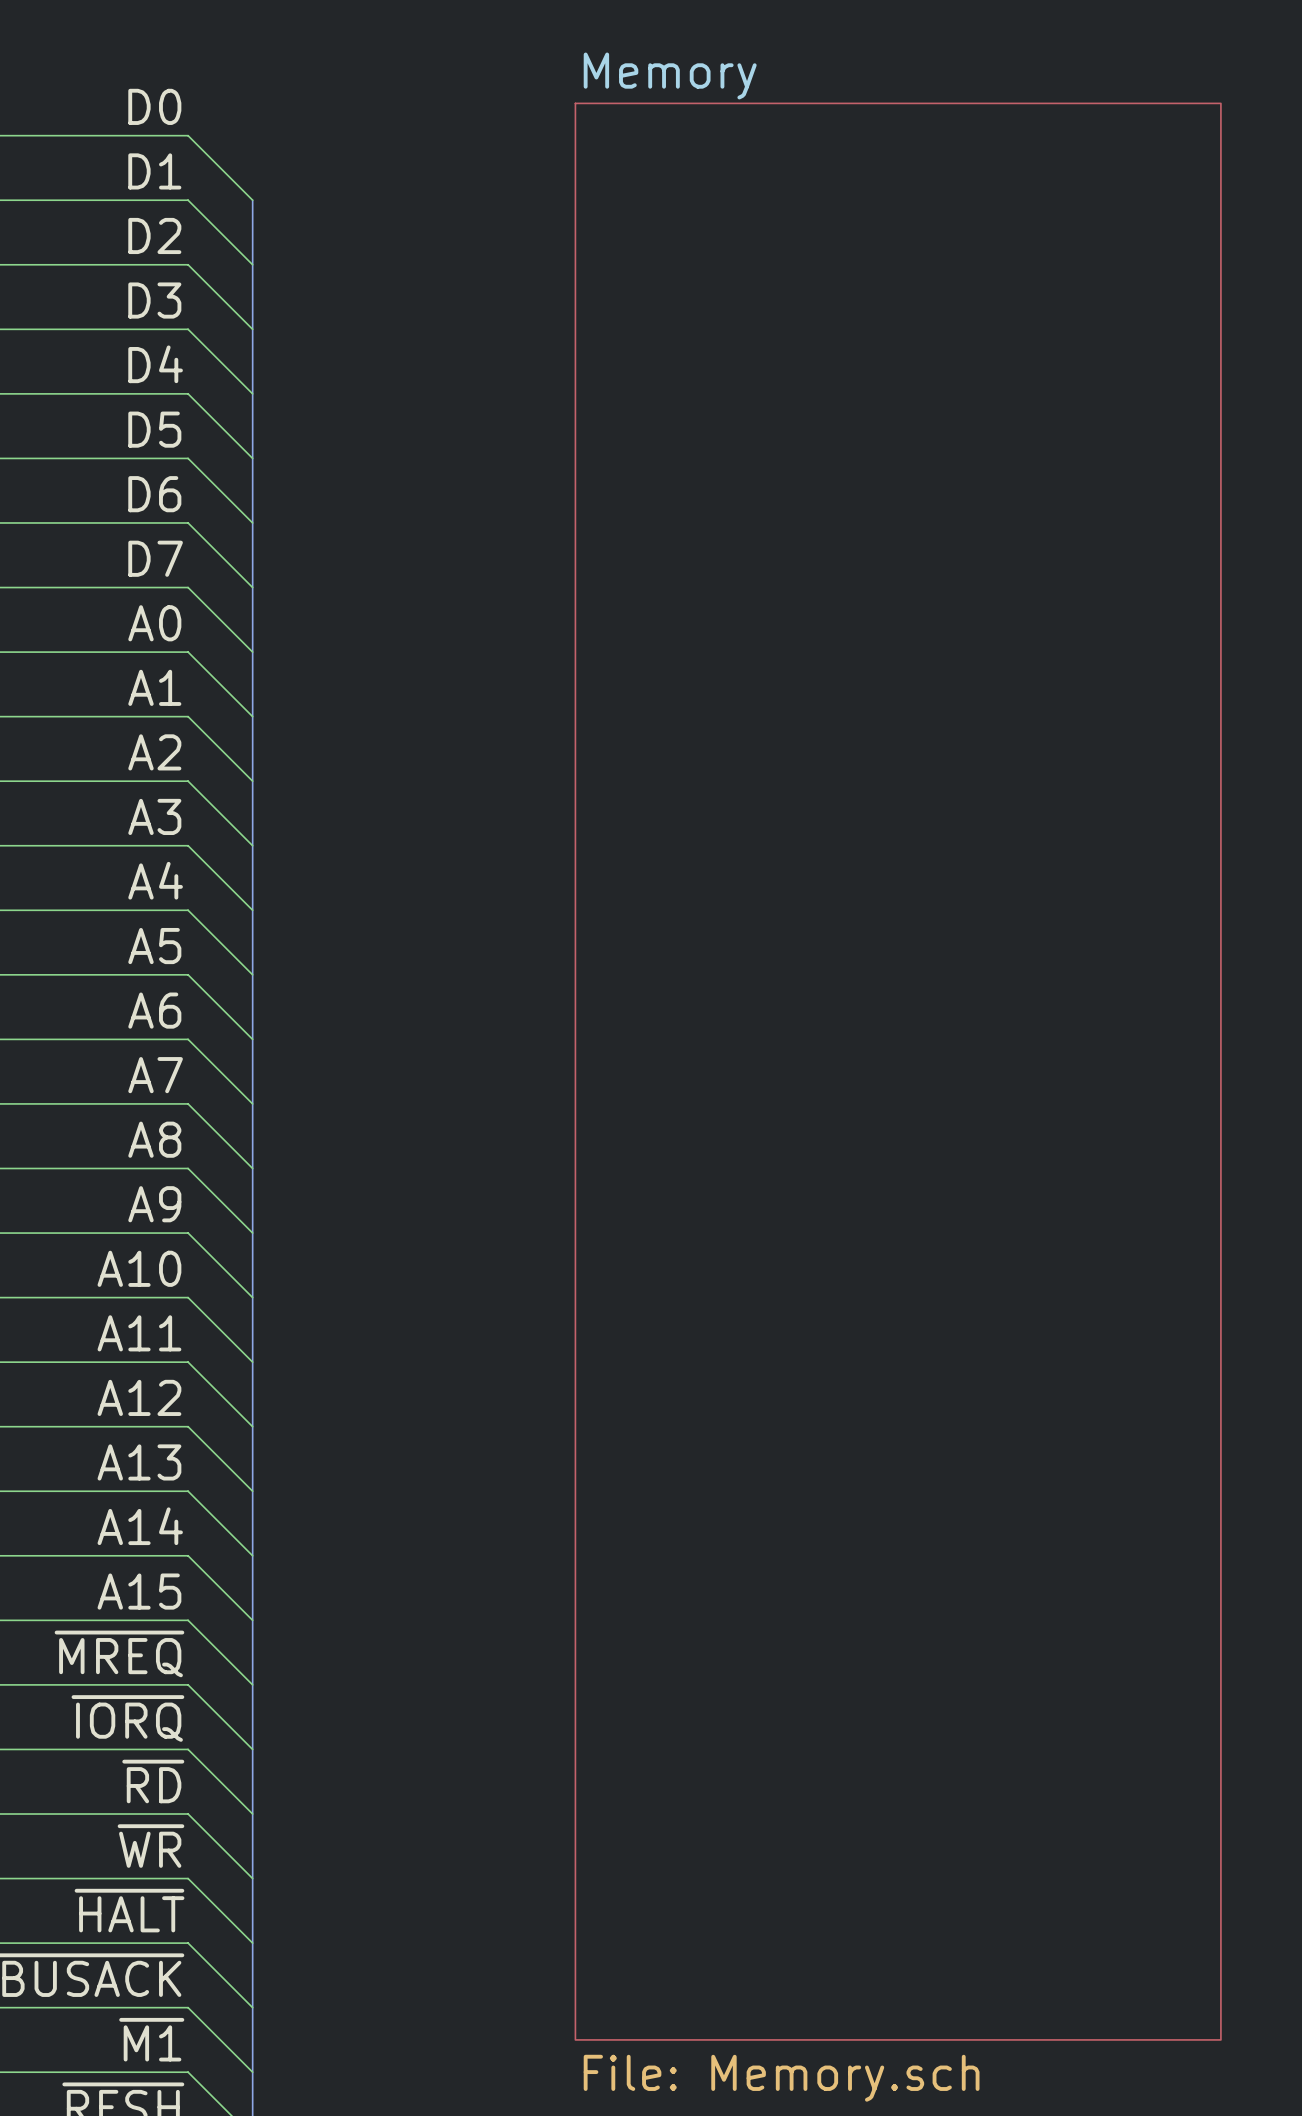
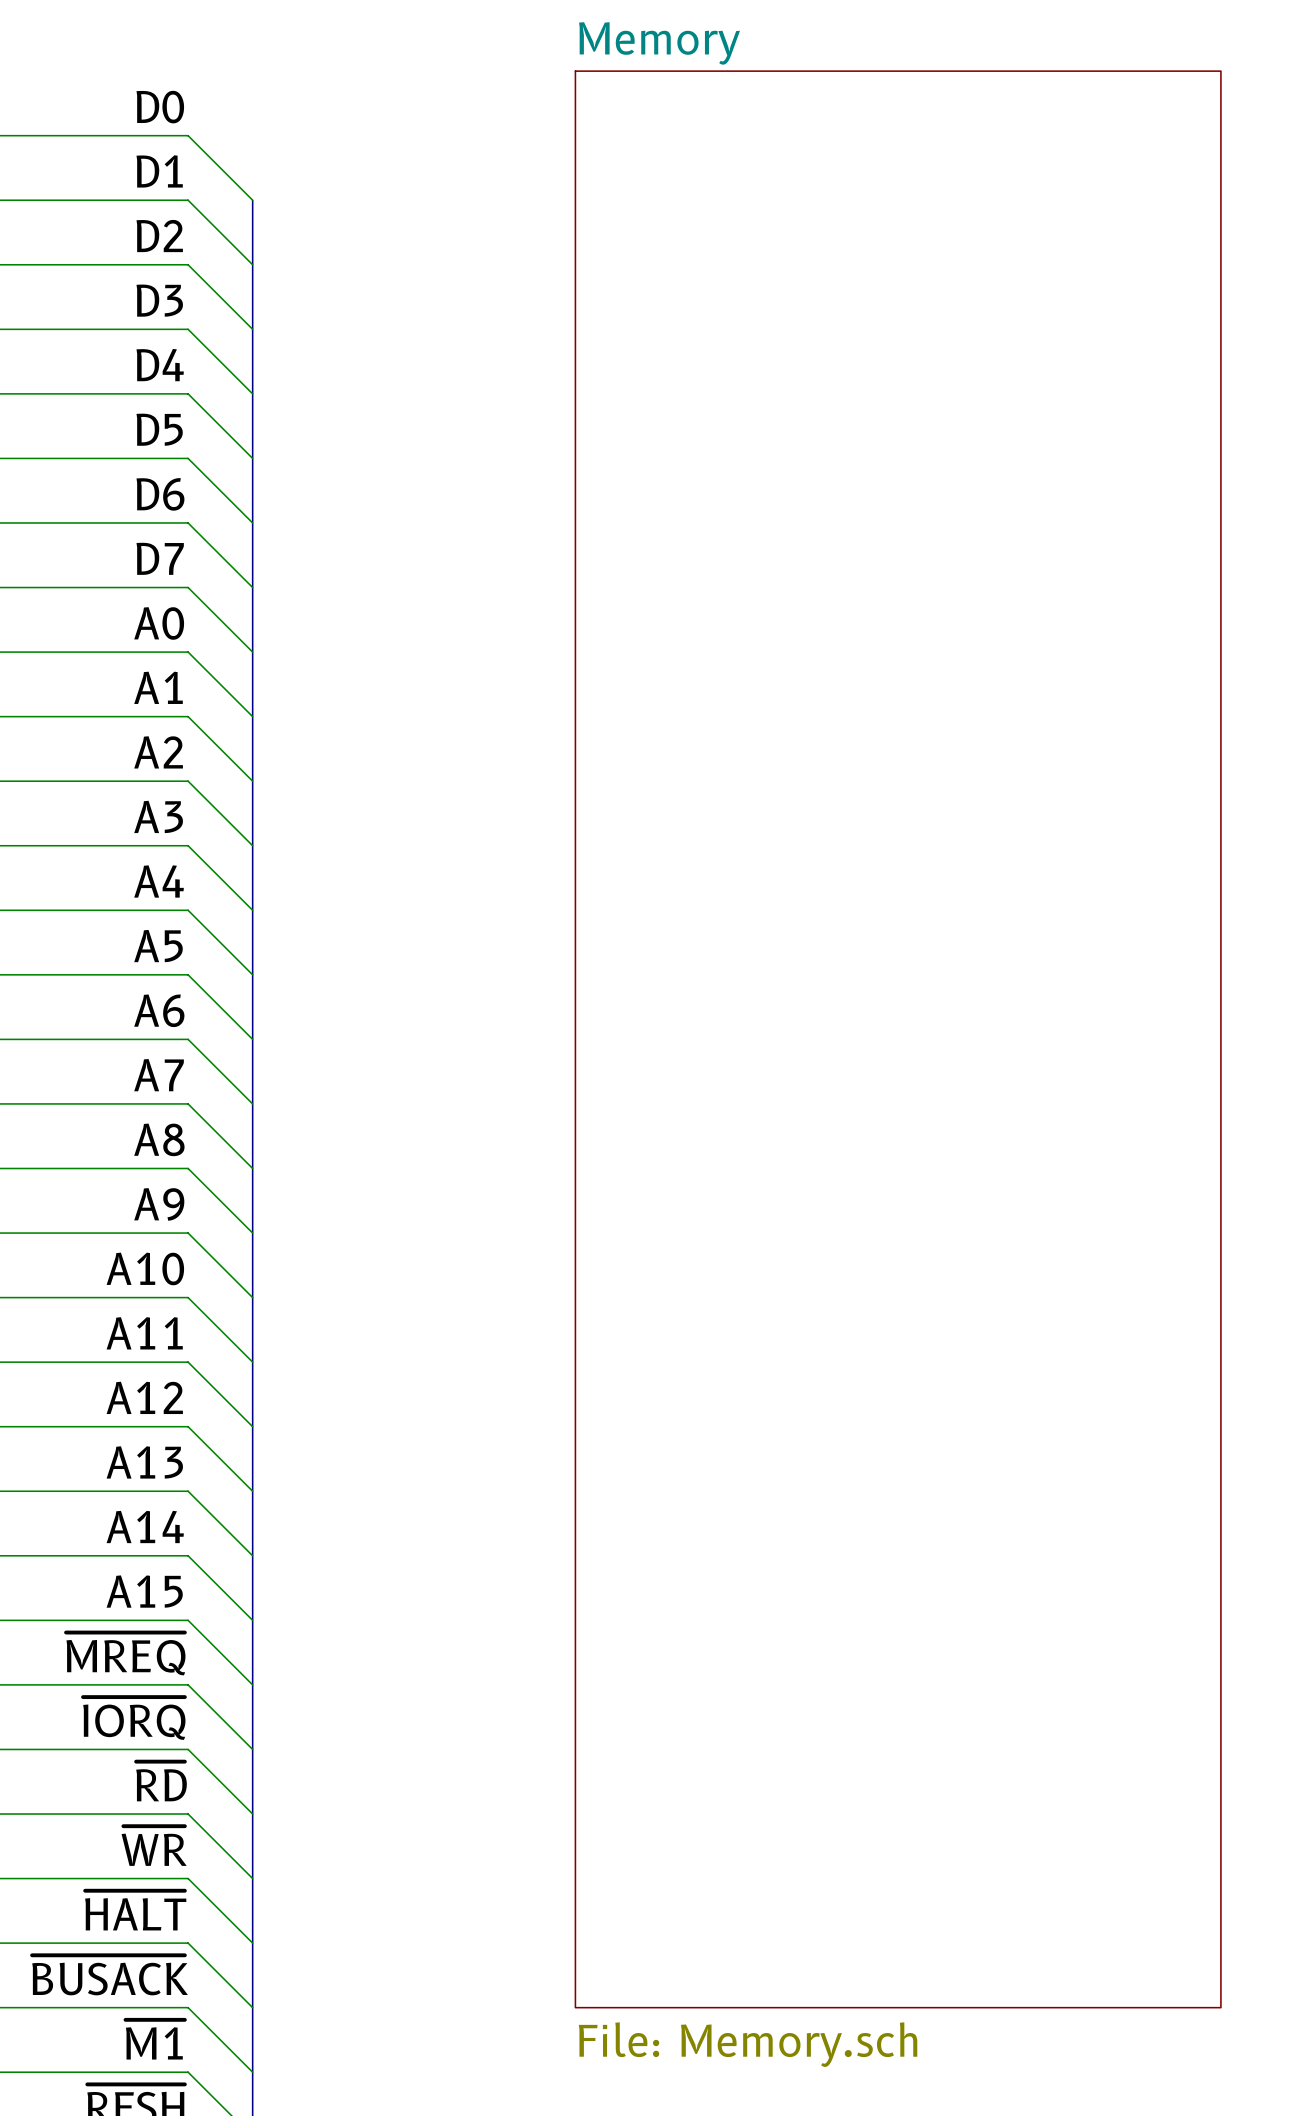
sheet Memory position: (898, 1071) -> (898, 1039)

